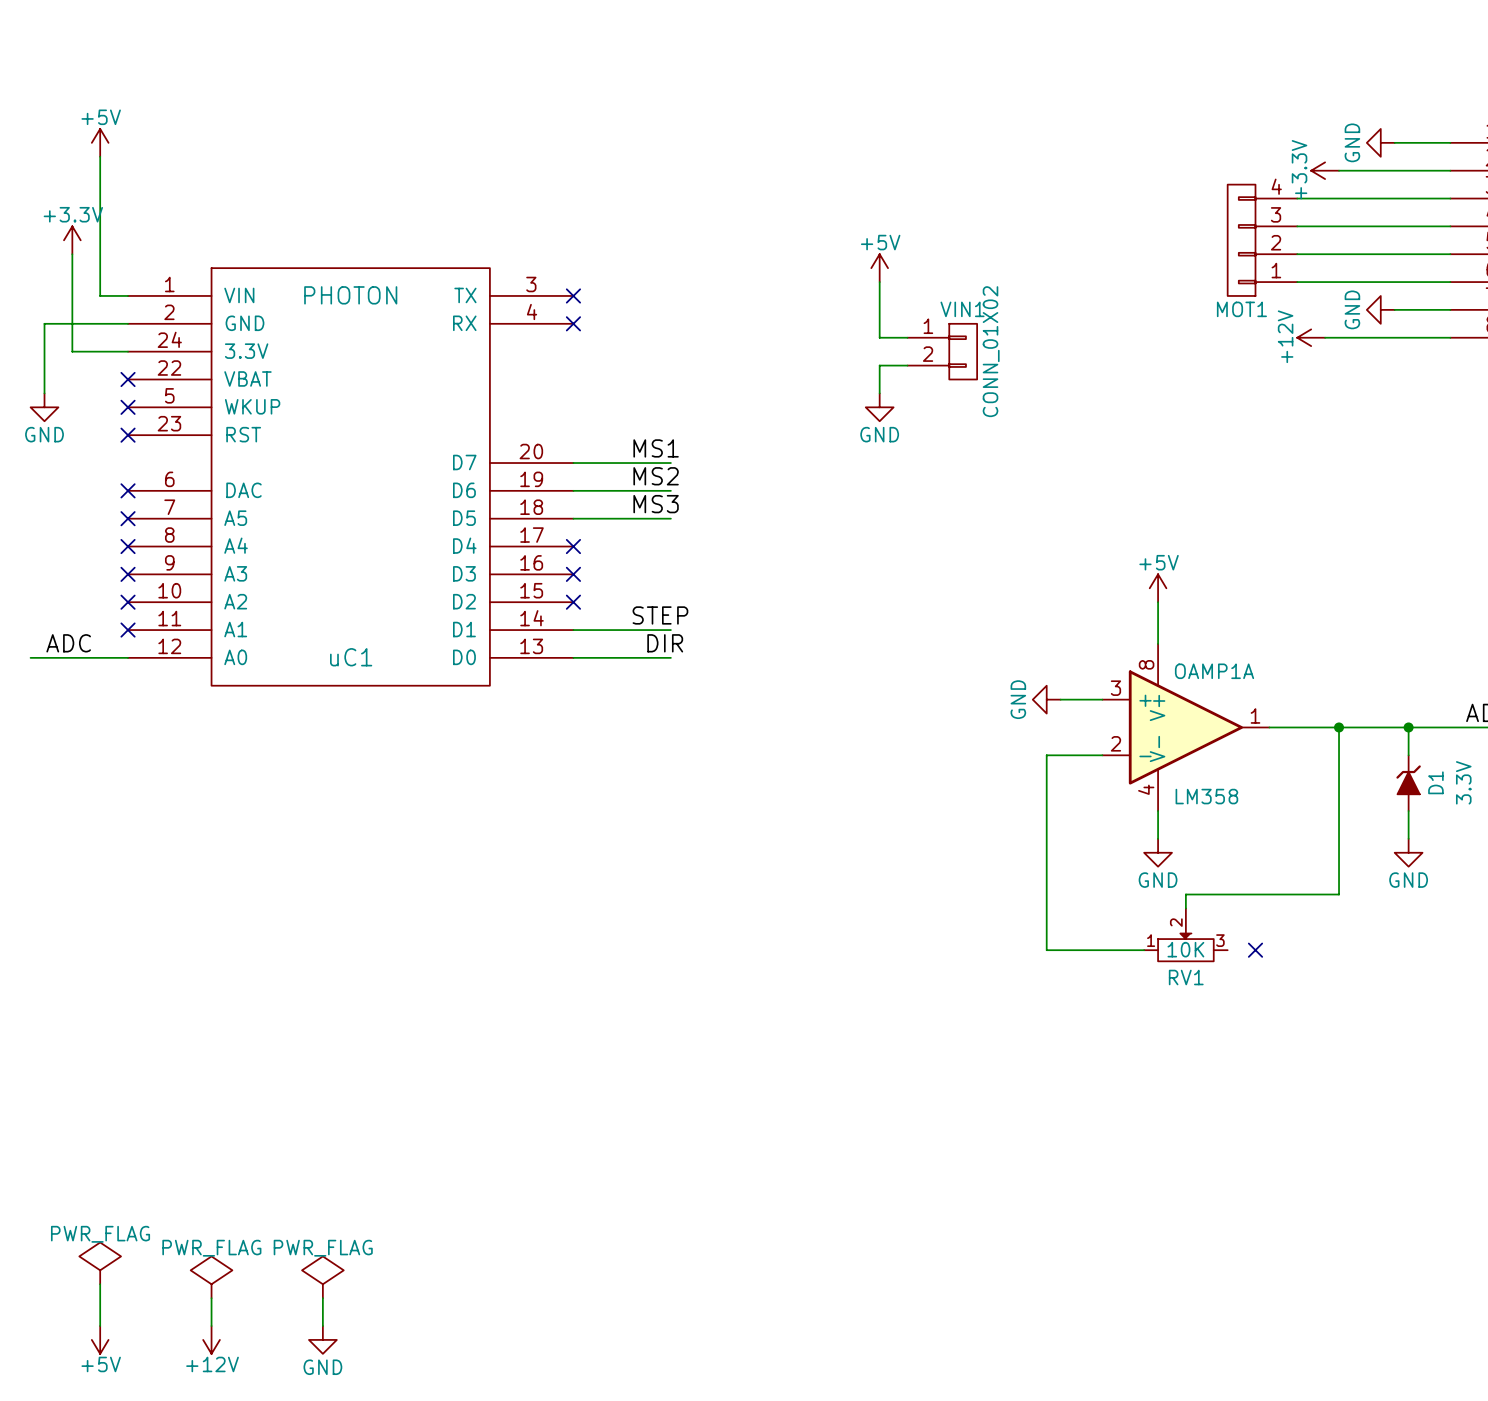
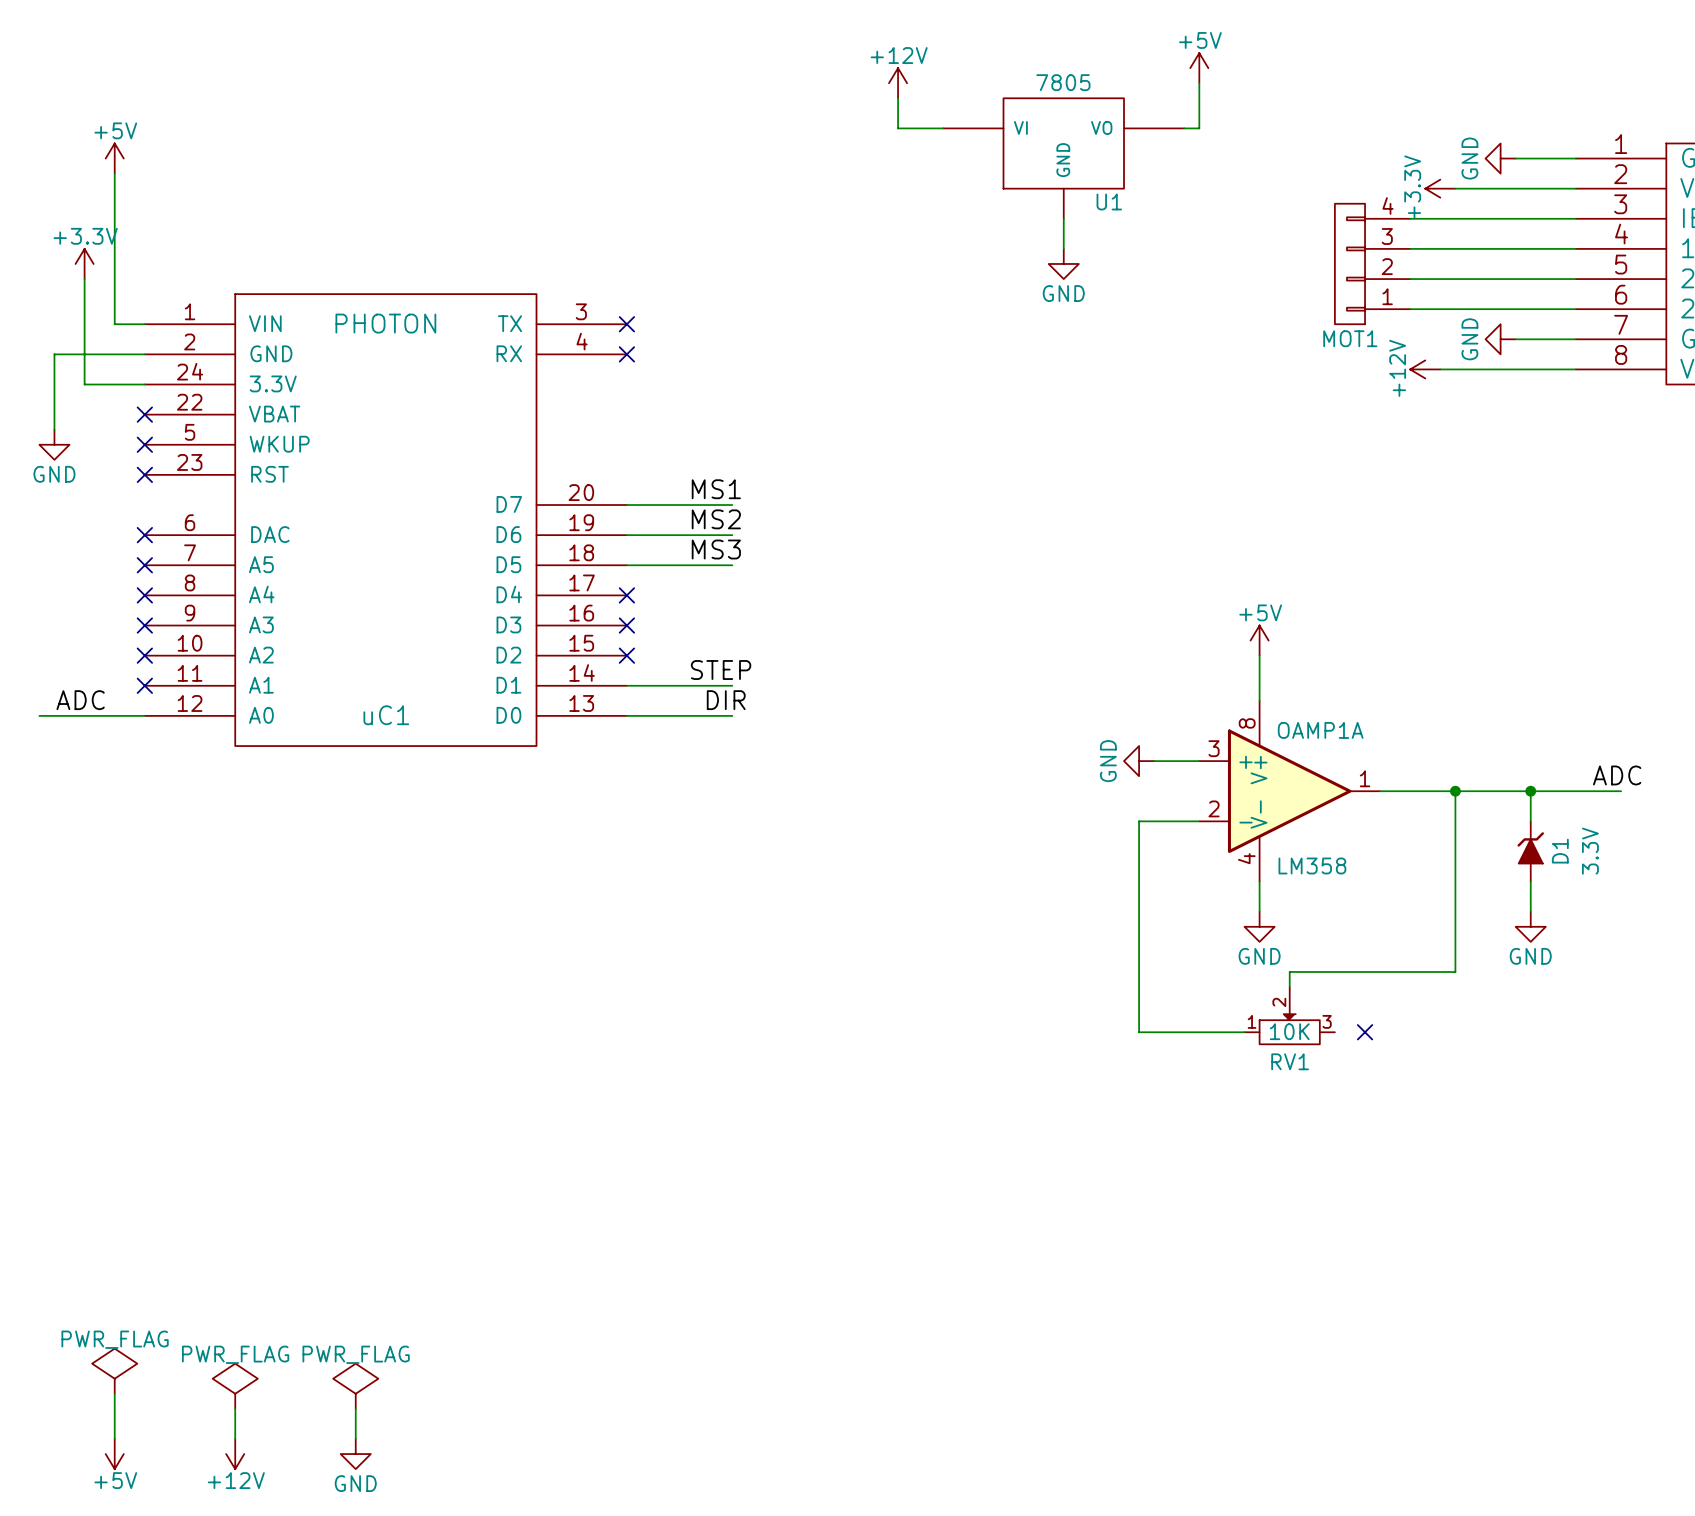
power symbol: none -> +5V (1199, 68)
power symbol: none -> +12V (898, 83)
wire: none -> (1199, 83) (1199, 128) (1184, 128)
wire: none -> (898, 98) (898, 128) (943, 128)
U1: none -> 7805 (1063, 158)
wire: none -> (1063, 218) (1063, 248)
power symbol: +5V (879, 268) -> none
wire: (879, 282) (879, 337) (907, 337) -> none
VIN1: CONN_01X02 (942, 351) -> none
wire: (907, 365) (879, 365) (879, 393) -> none
power symbol position: GND (879, 407) -> GND (1063, 263)

